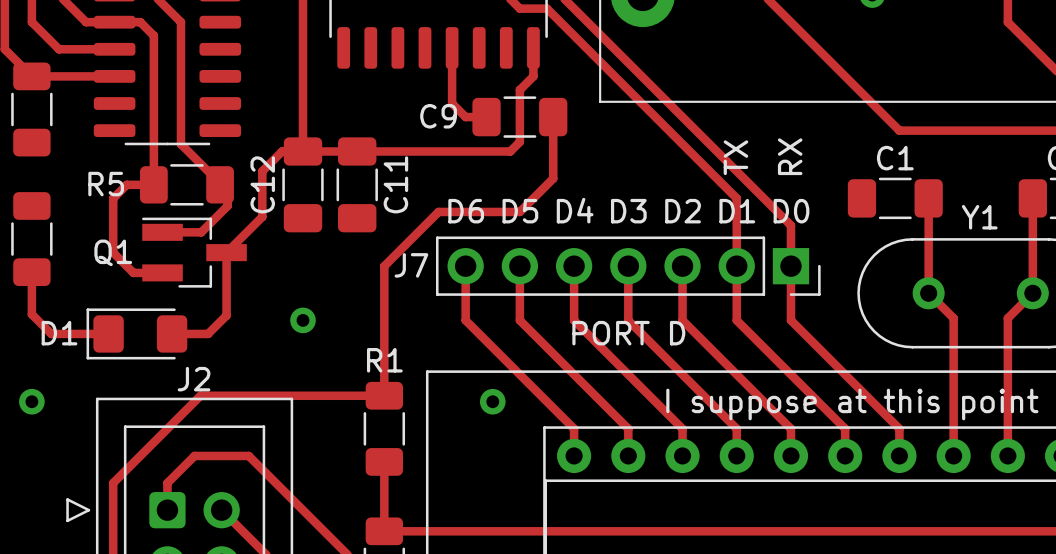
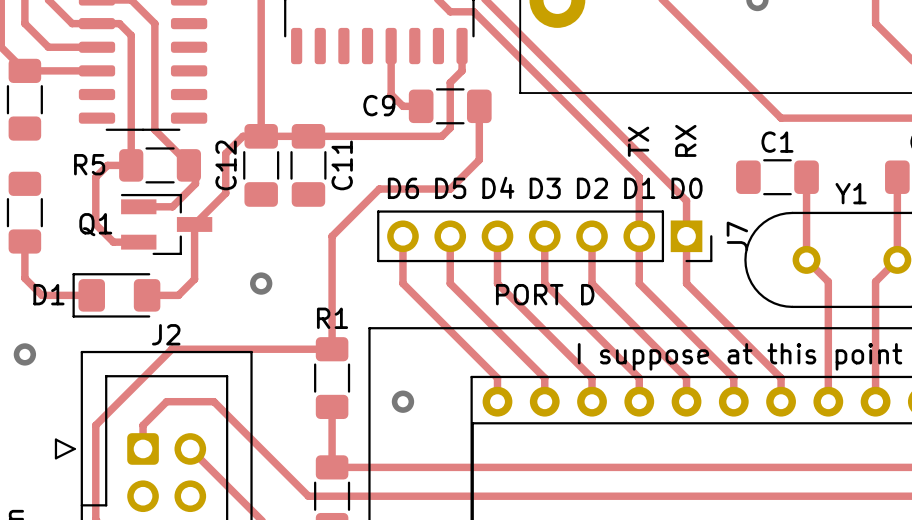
J7 name rotation: 0° (411, 265) -> 90° counterclockwise (737, 236)
J7 name position: J7 (411, 265) -> J7 (737, 236)
via position: (492, 401) -> (402, 401)

